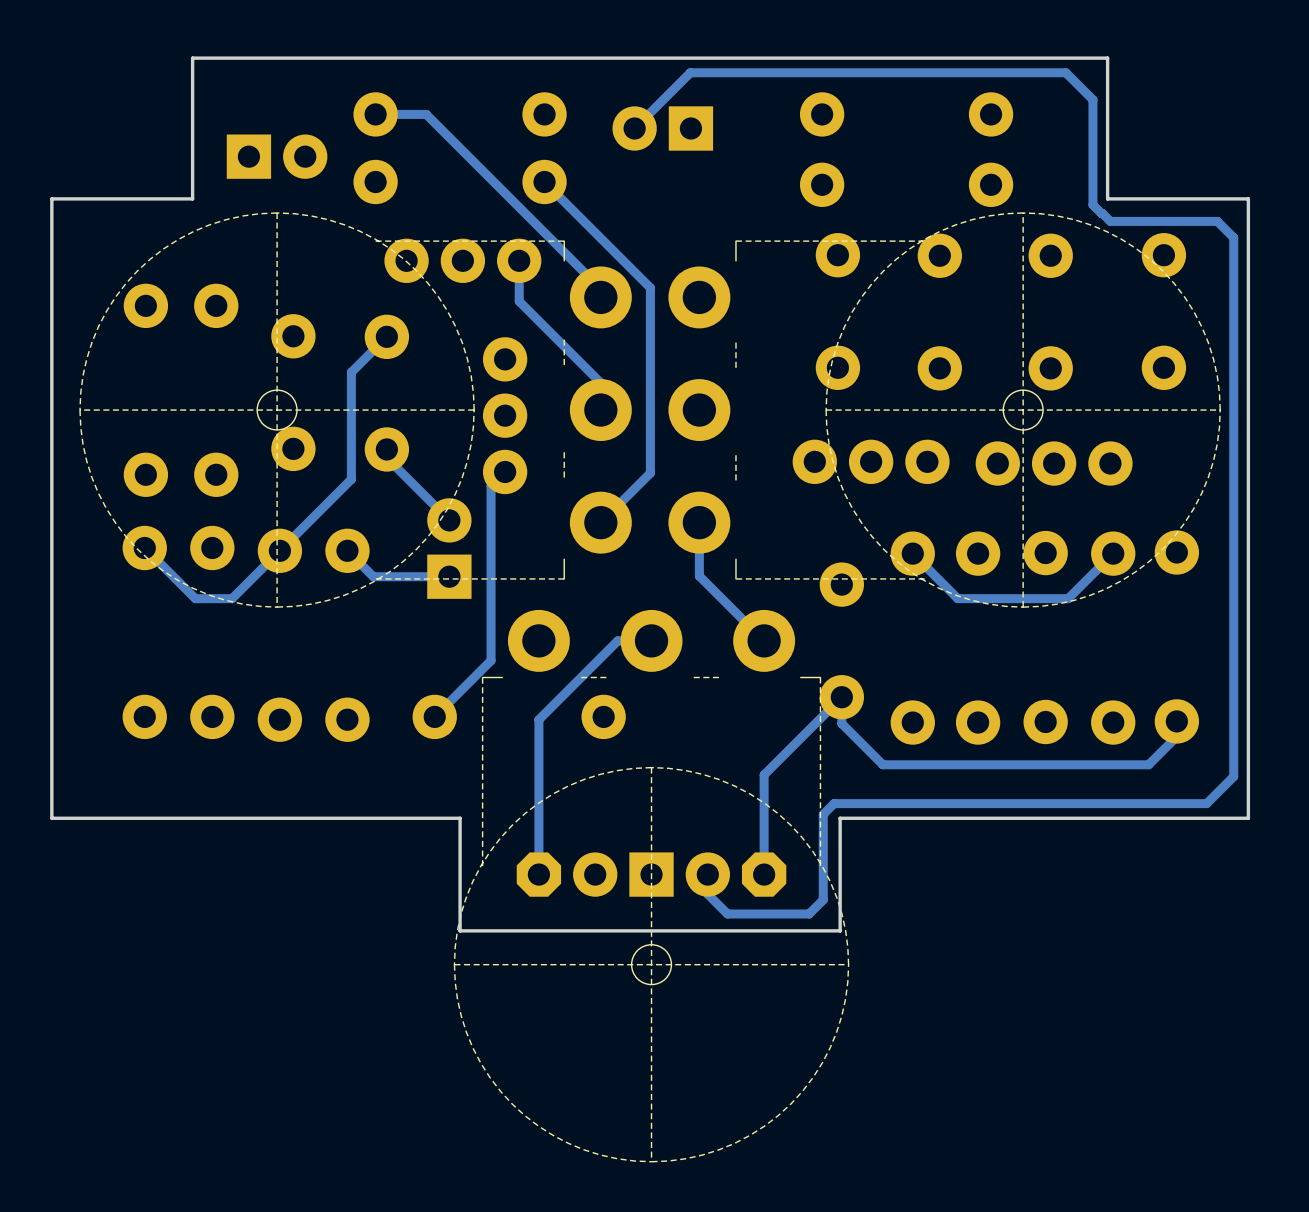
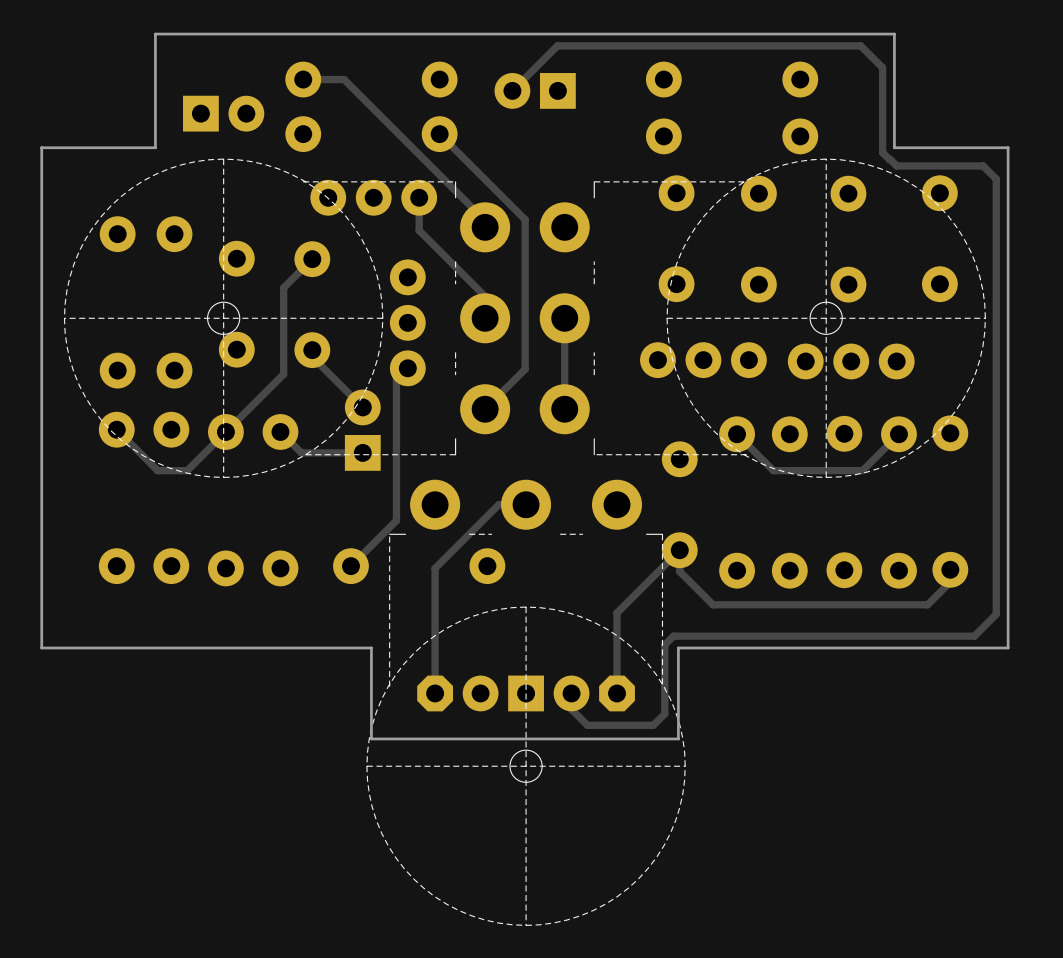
track: (699, 522) (699, 576) (764, 640) -> (564, 409) (564, 318)

